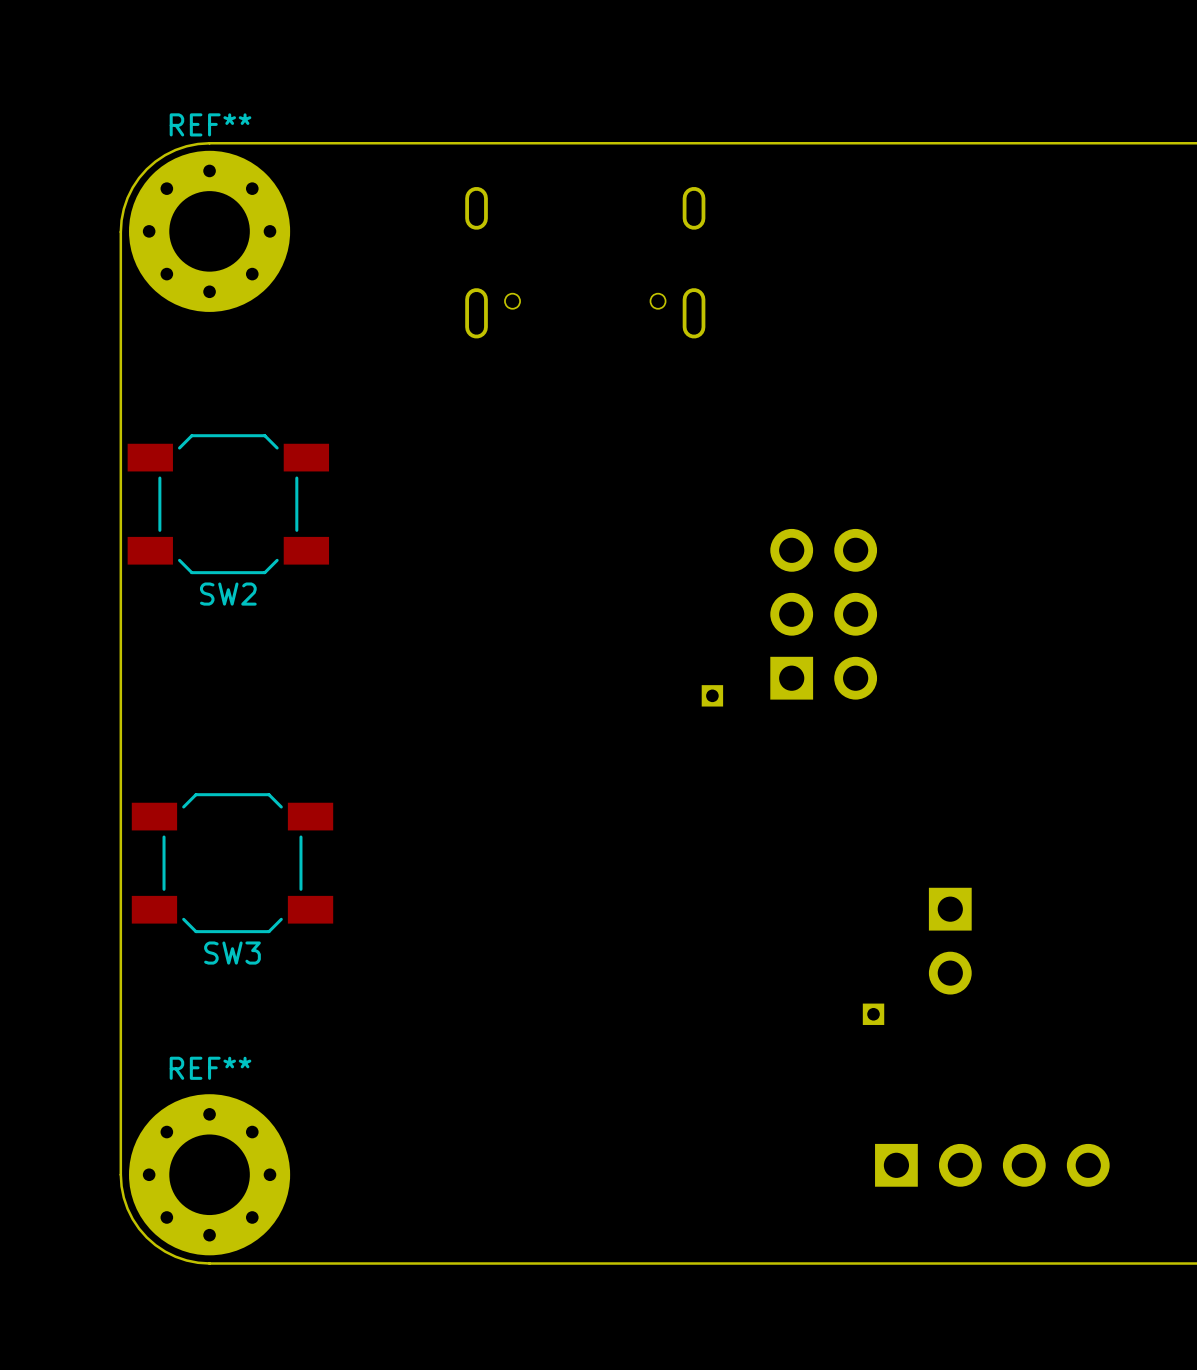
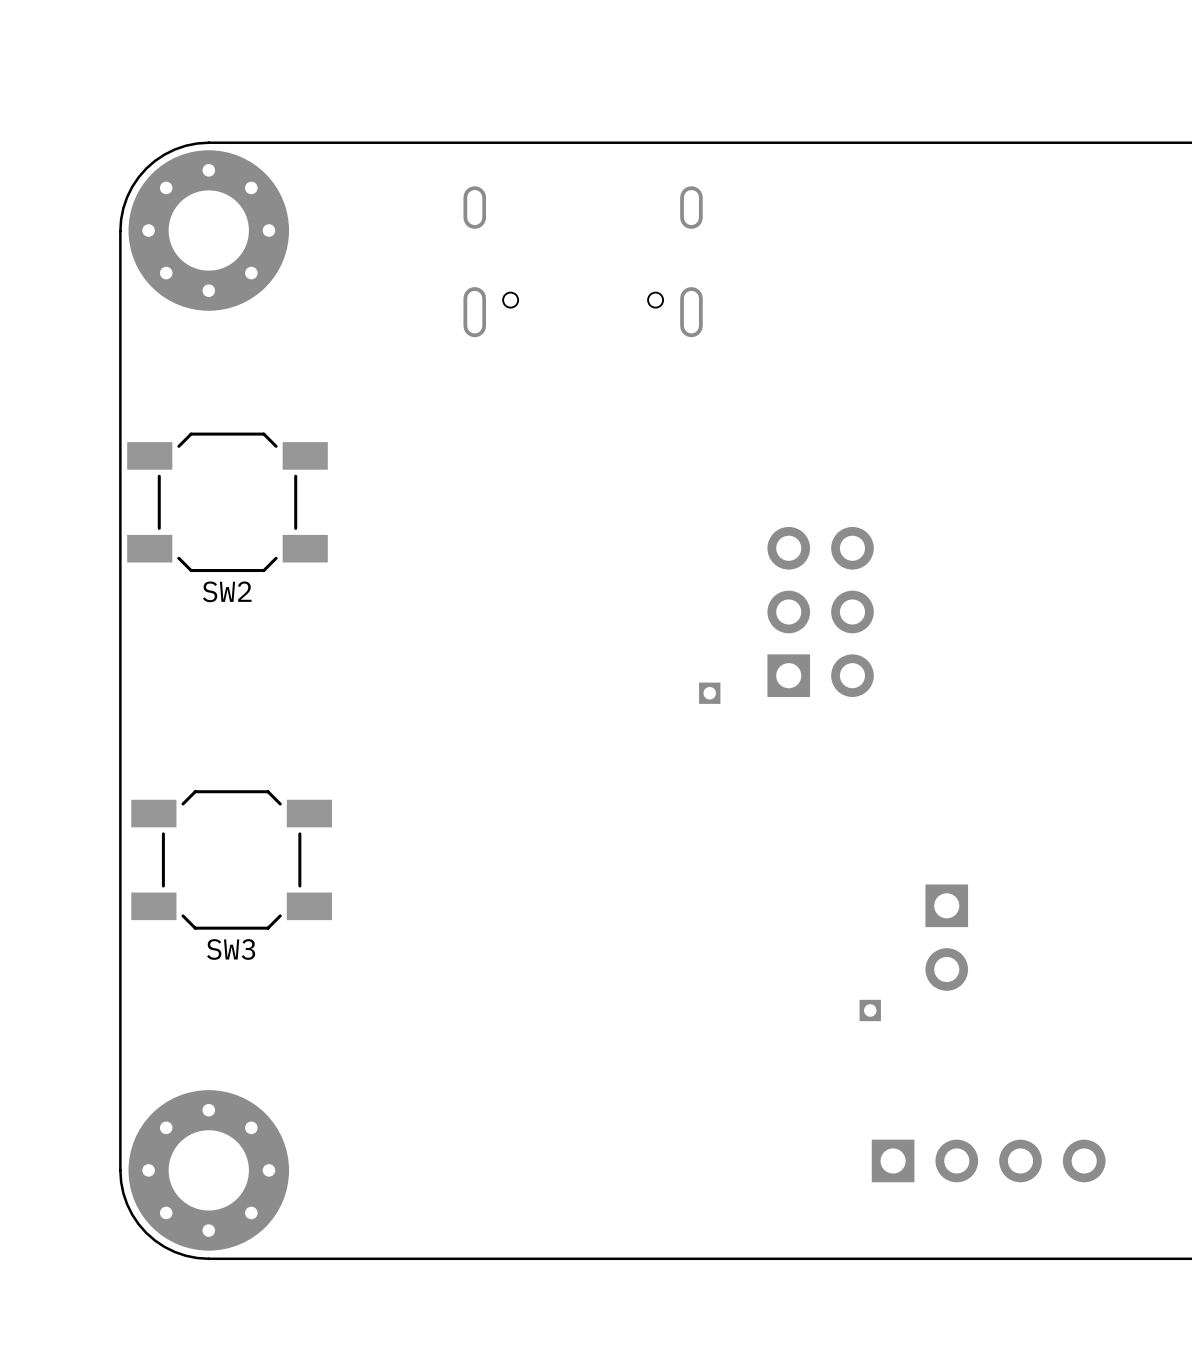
REF** name: REF** (210, 124) -> none
REF** name: REF** (210, 1068) -> none

